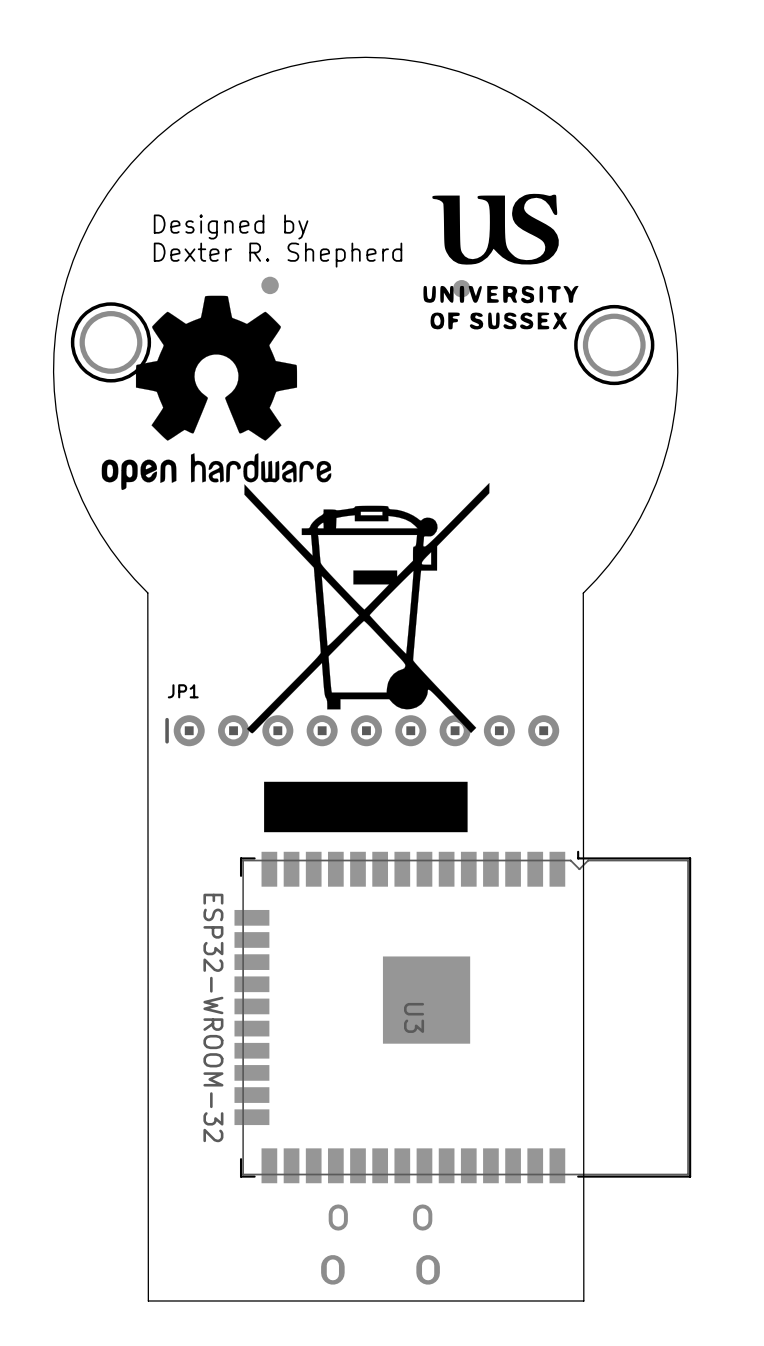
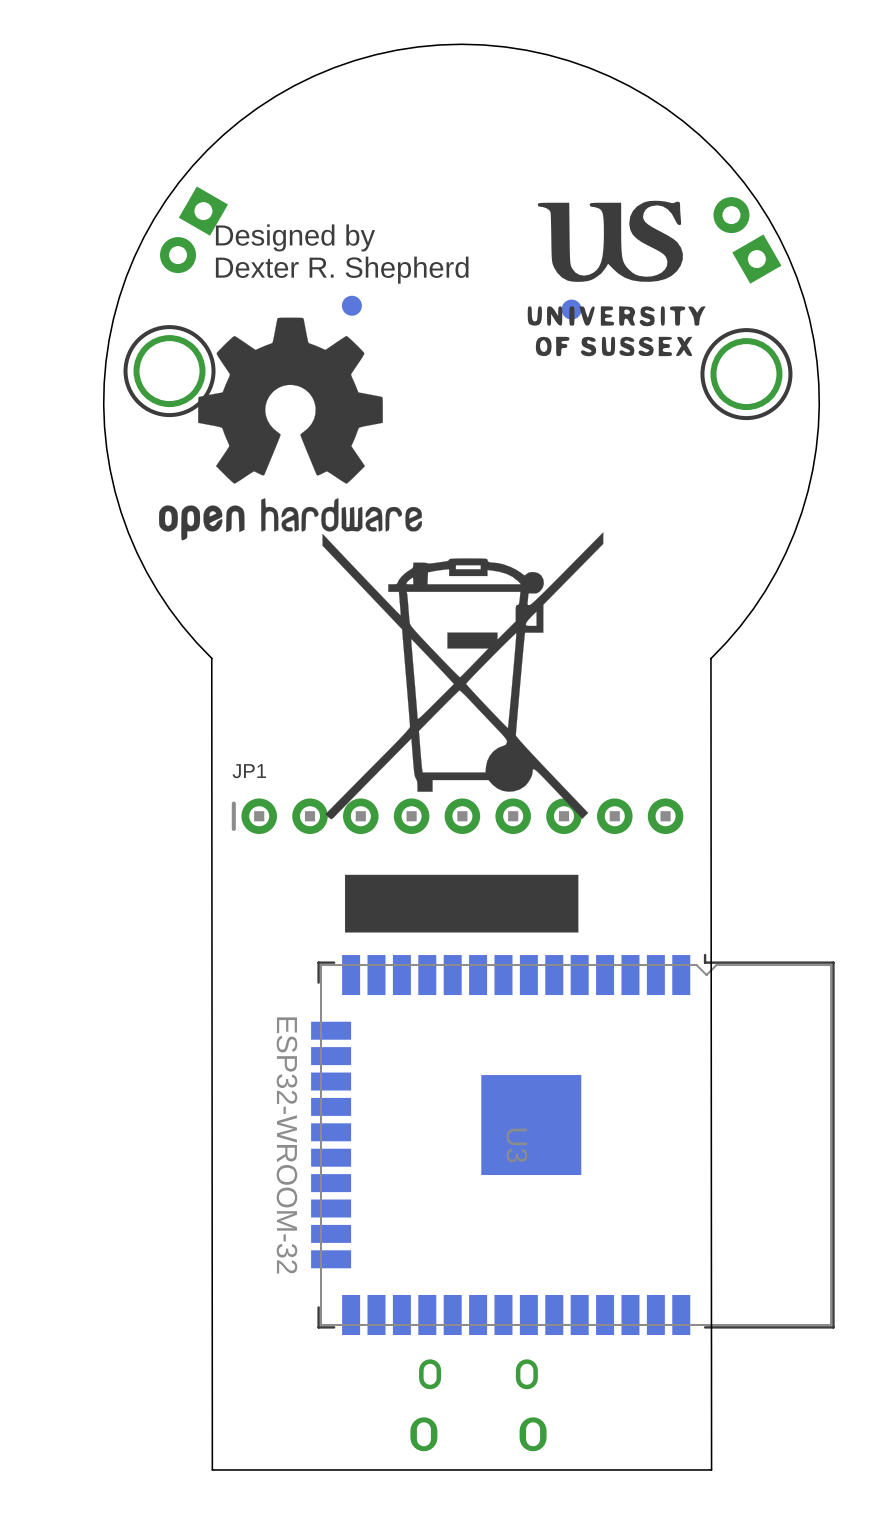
part: none -> (194, 229)
part: none -> (747, 240)

